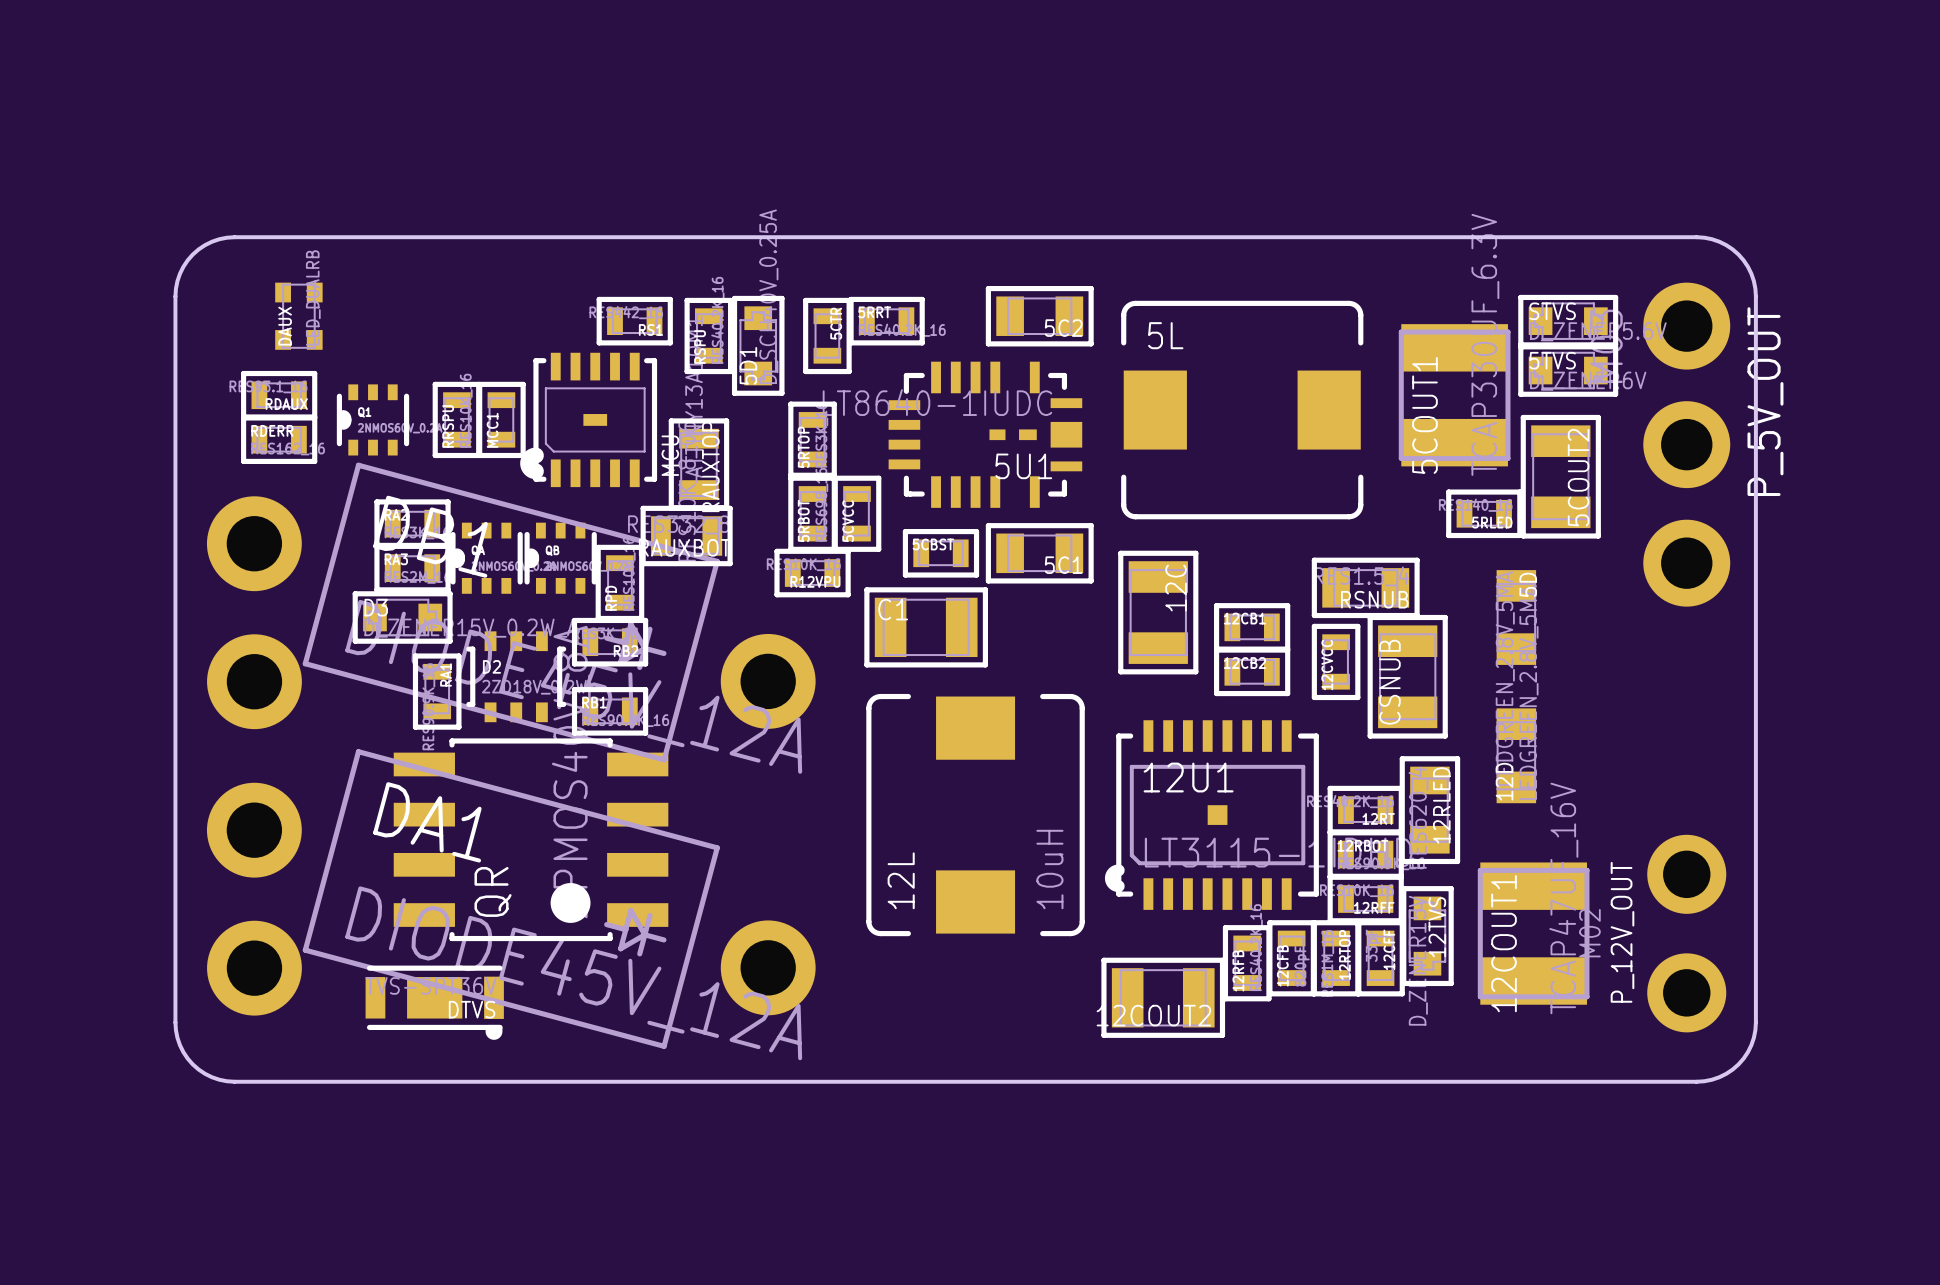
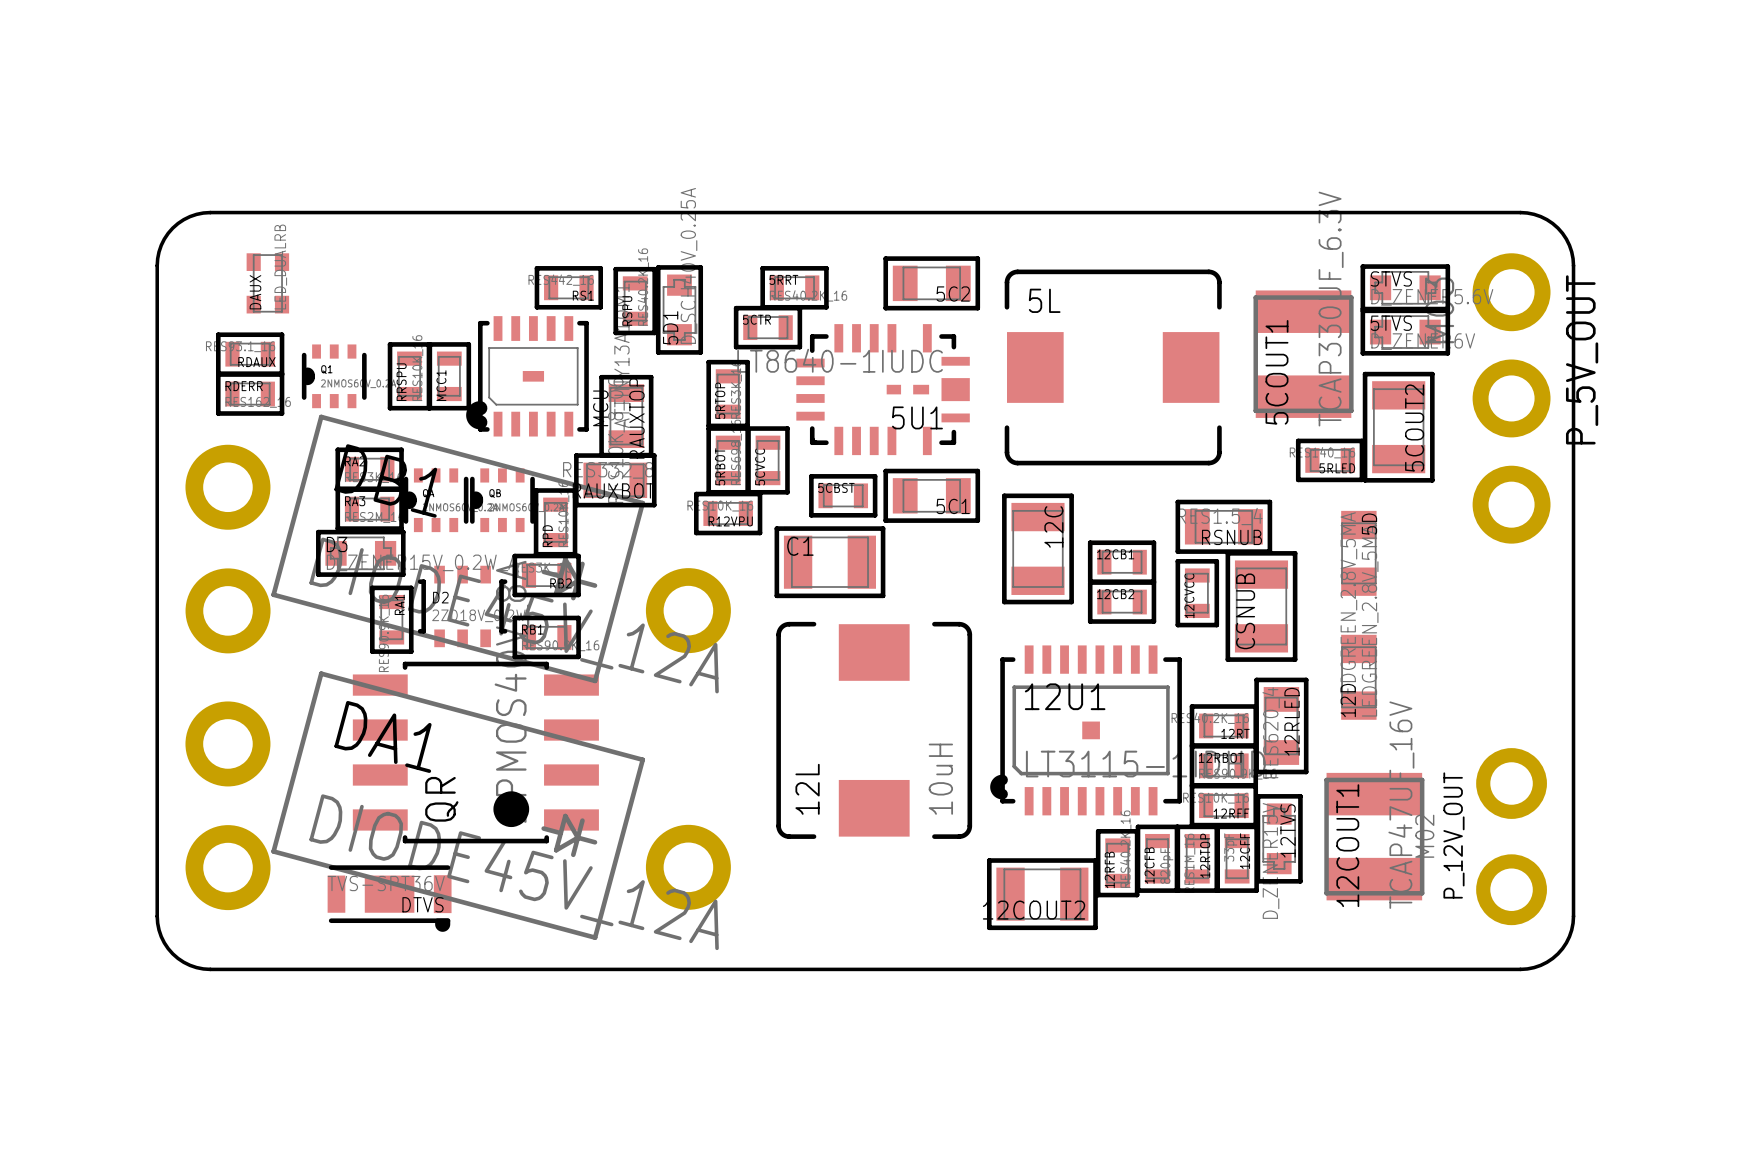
5CTR rotation: 0° (827, 335) -> 90° clockwise (767, 327)

